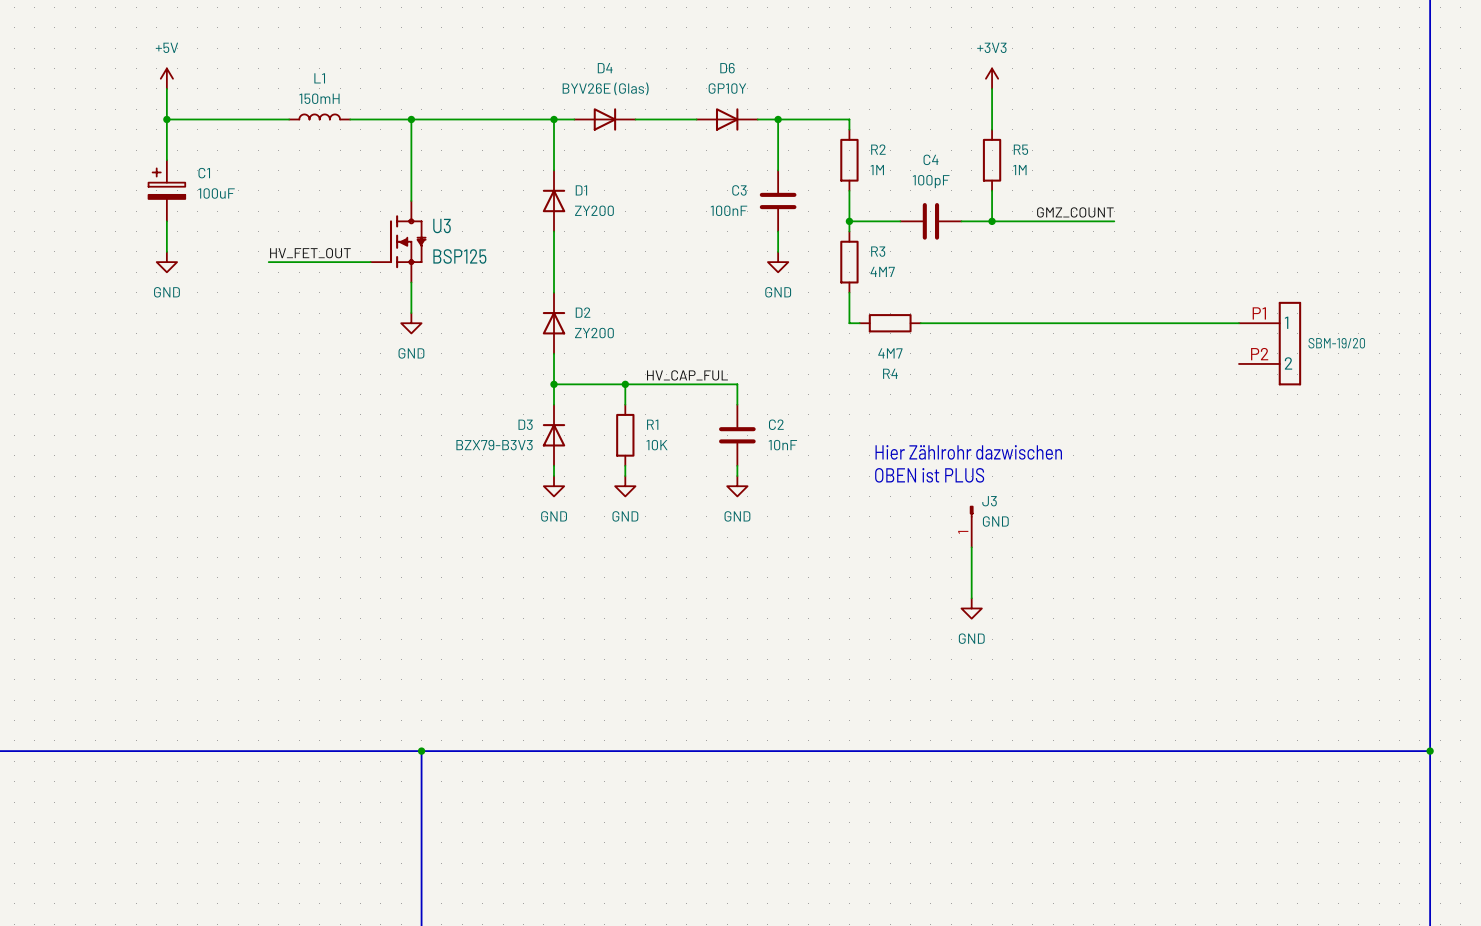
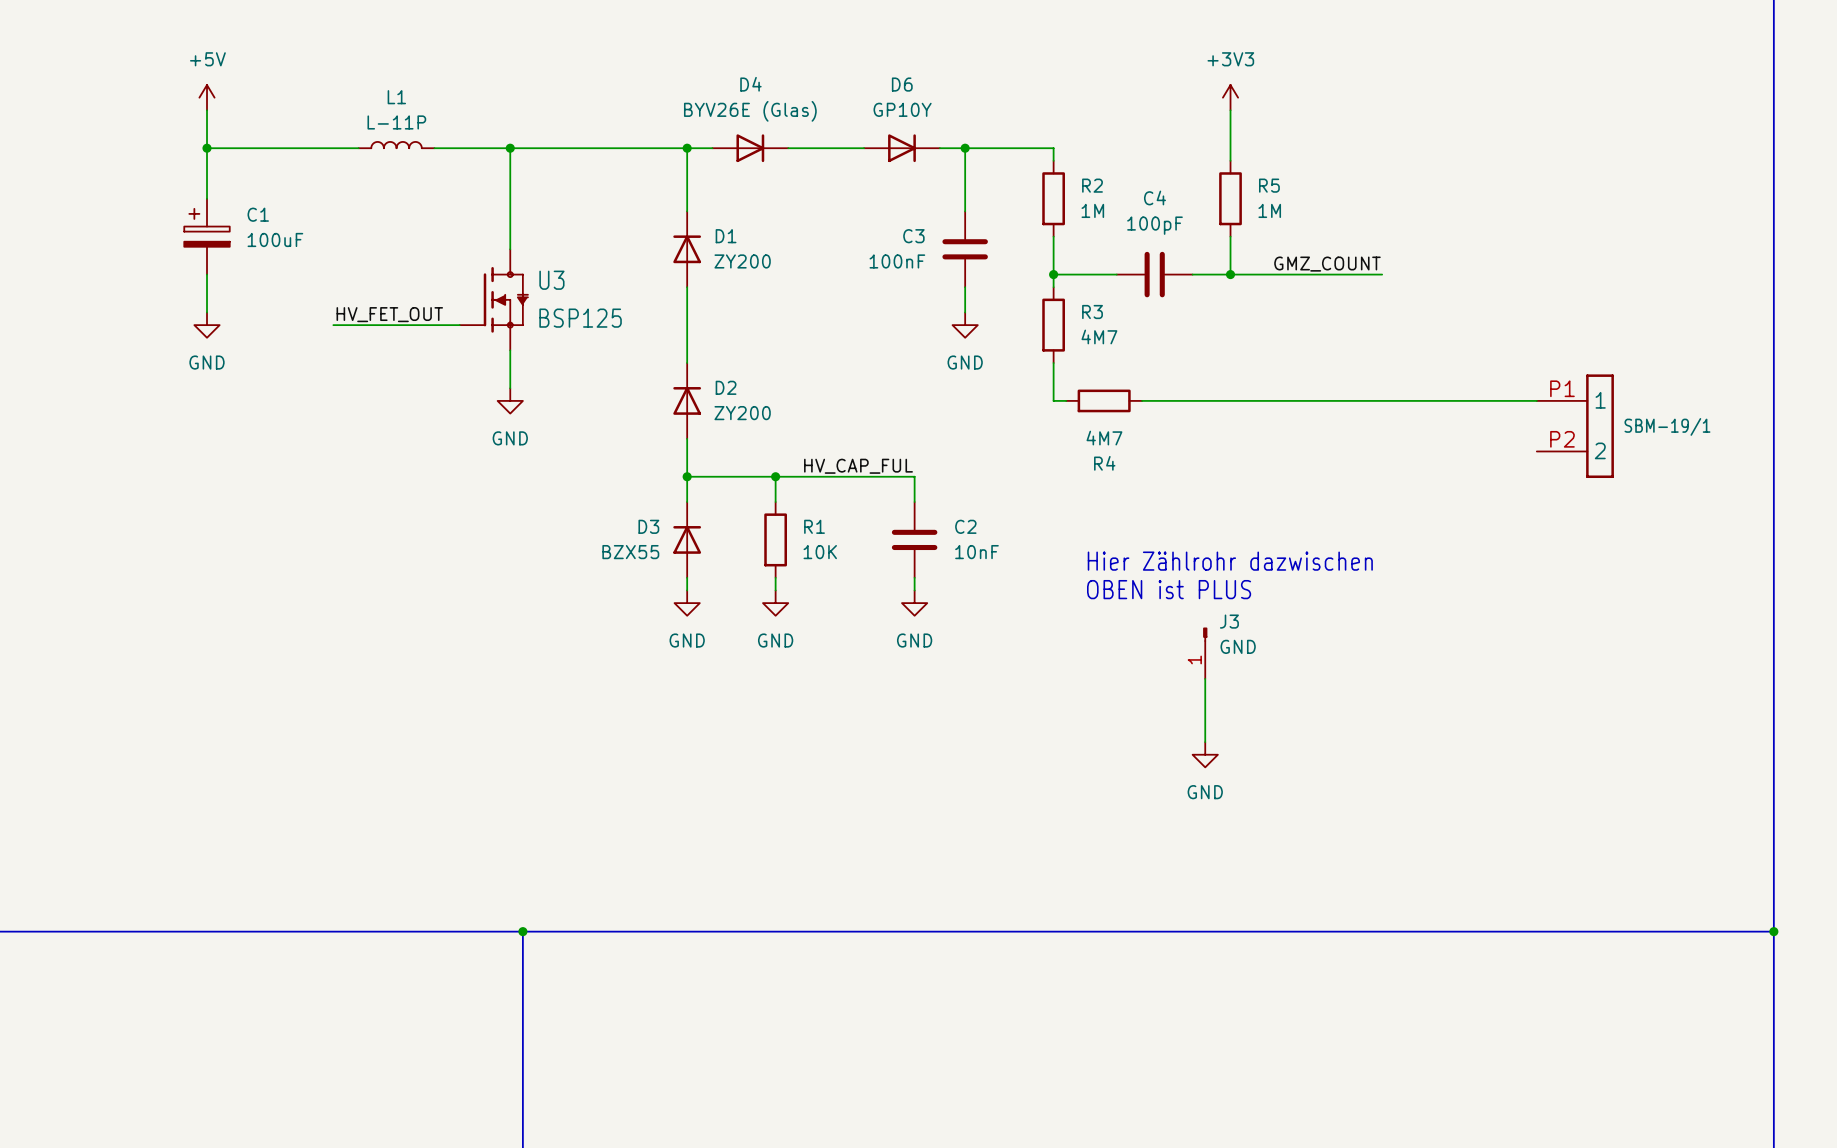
L1 value: 150mH (319, 98) -> L-11P (396, 122)
SBM-19/20 name: SBM-19/20 (1336, 343) -> SBM-19/1 (1667, 426)
D3 value: BZX79-B3V3 (494, 445) -> BZX55 (630, 552)

